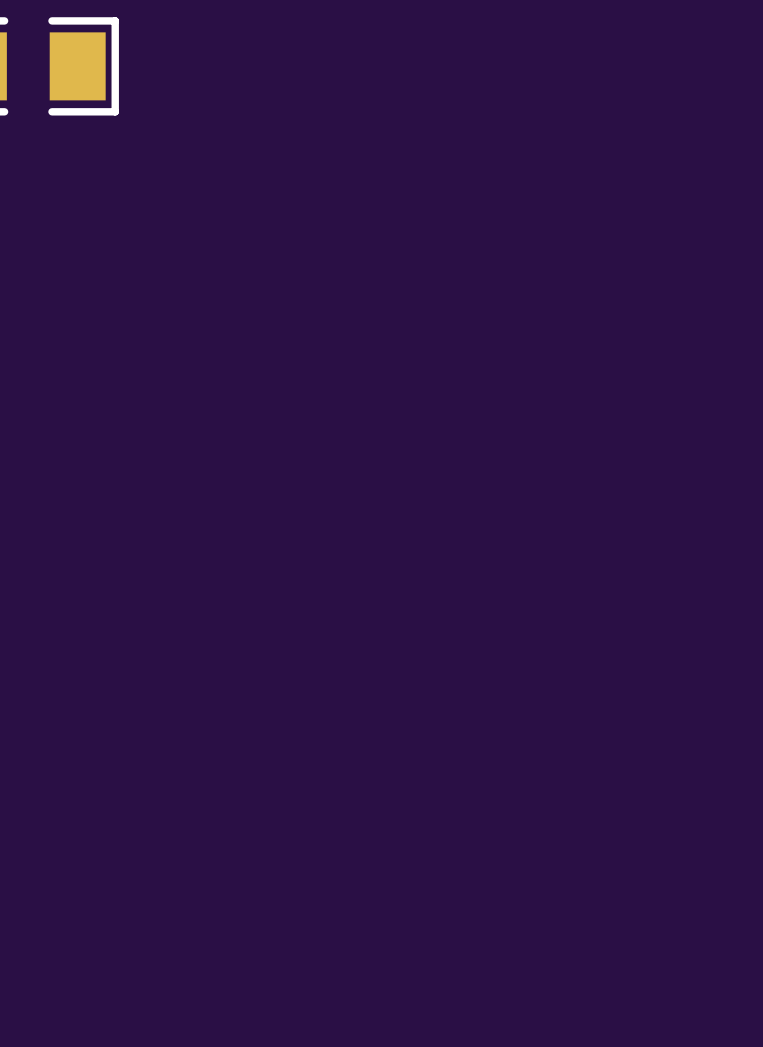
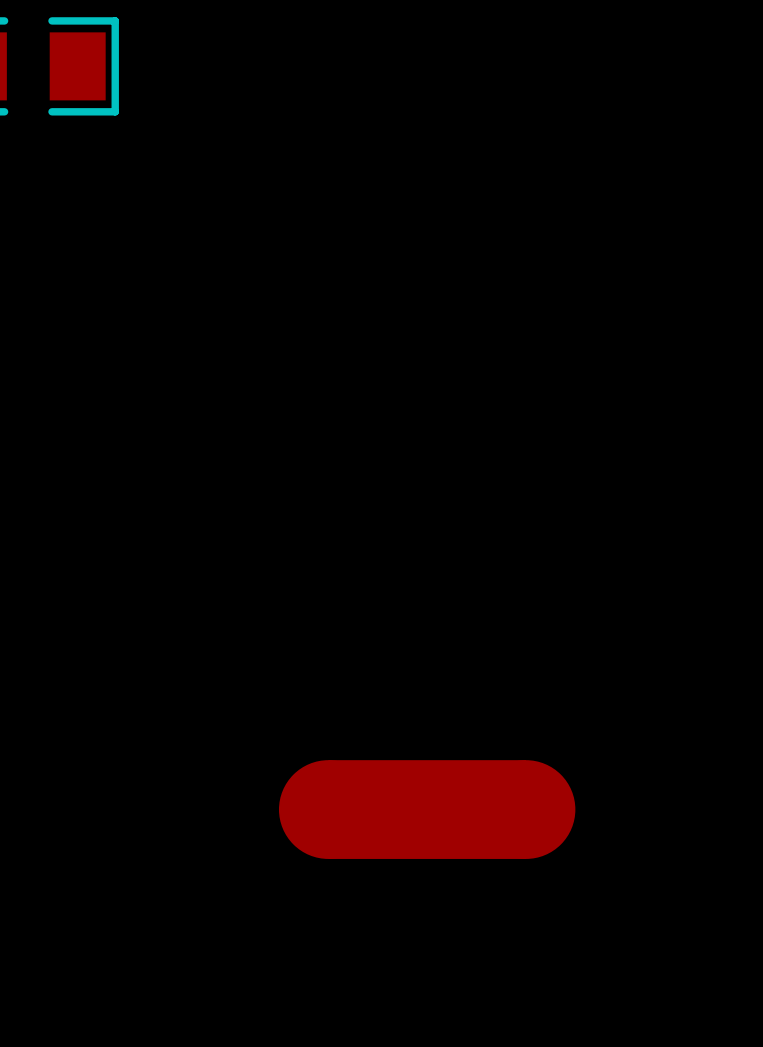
part: none -> (427, 809)

